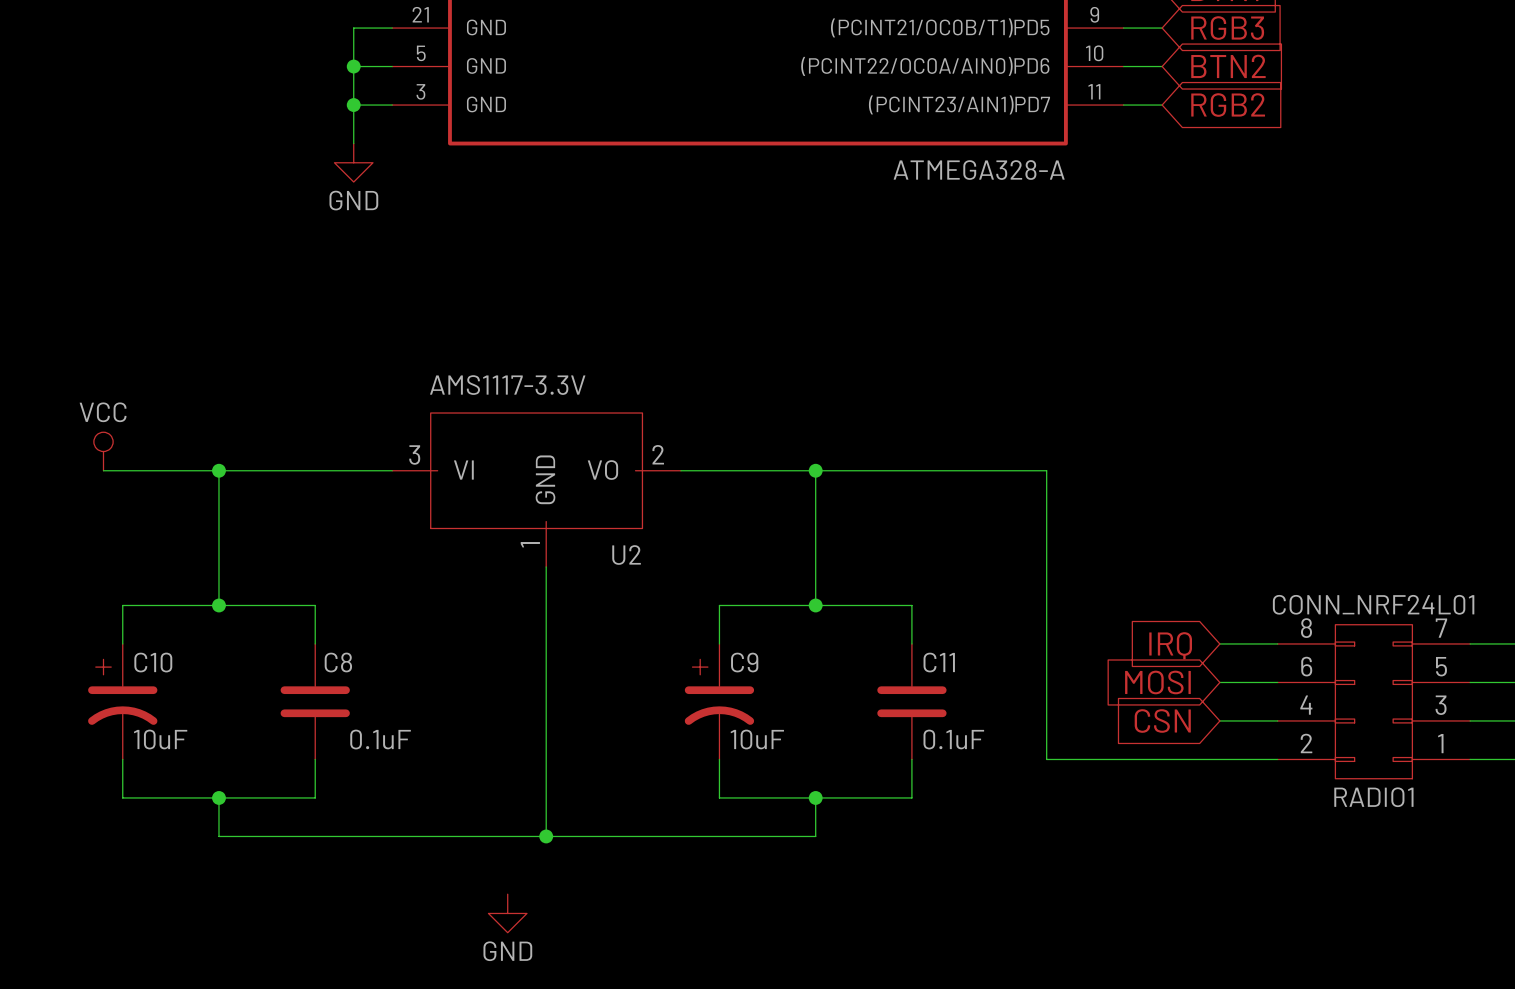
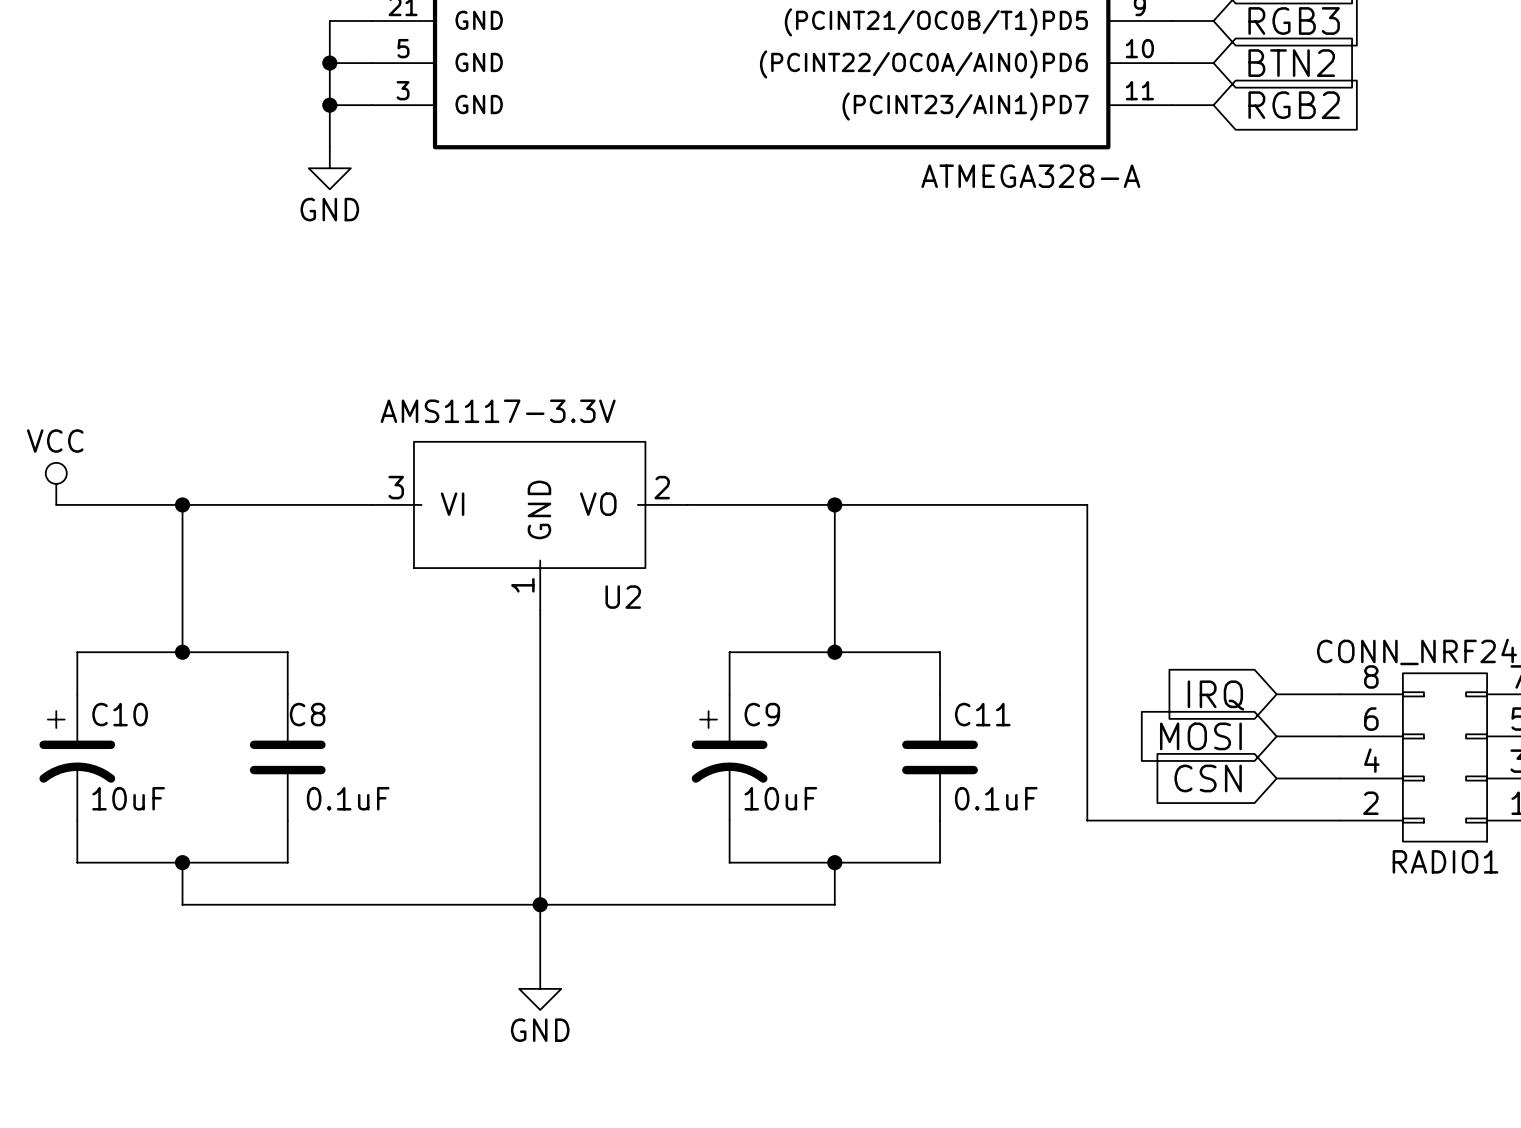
wire: none -> (540, 904) (540, 967)
power symbol position: GND (507, 913) -> GND (540, 988)

